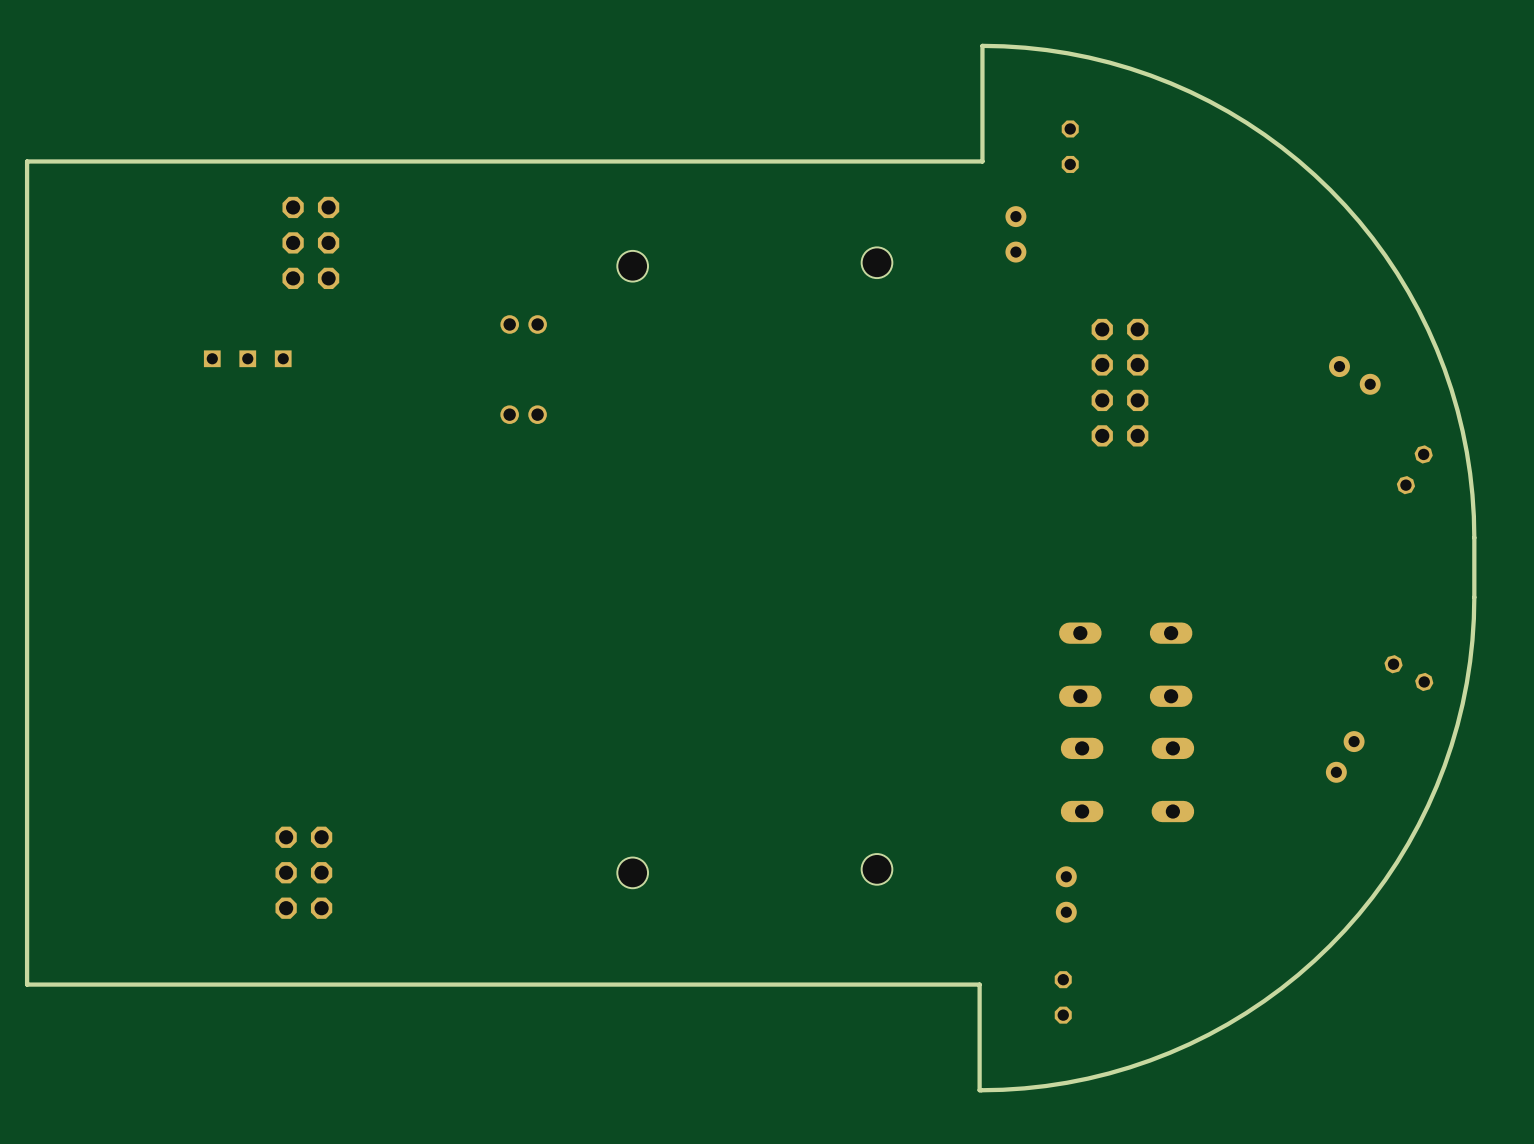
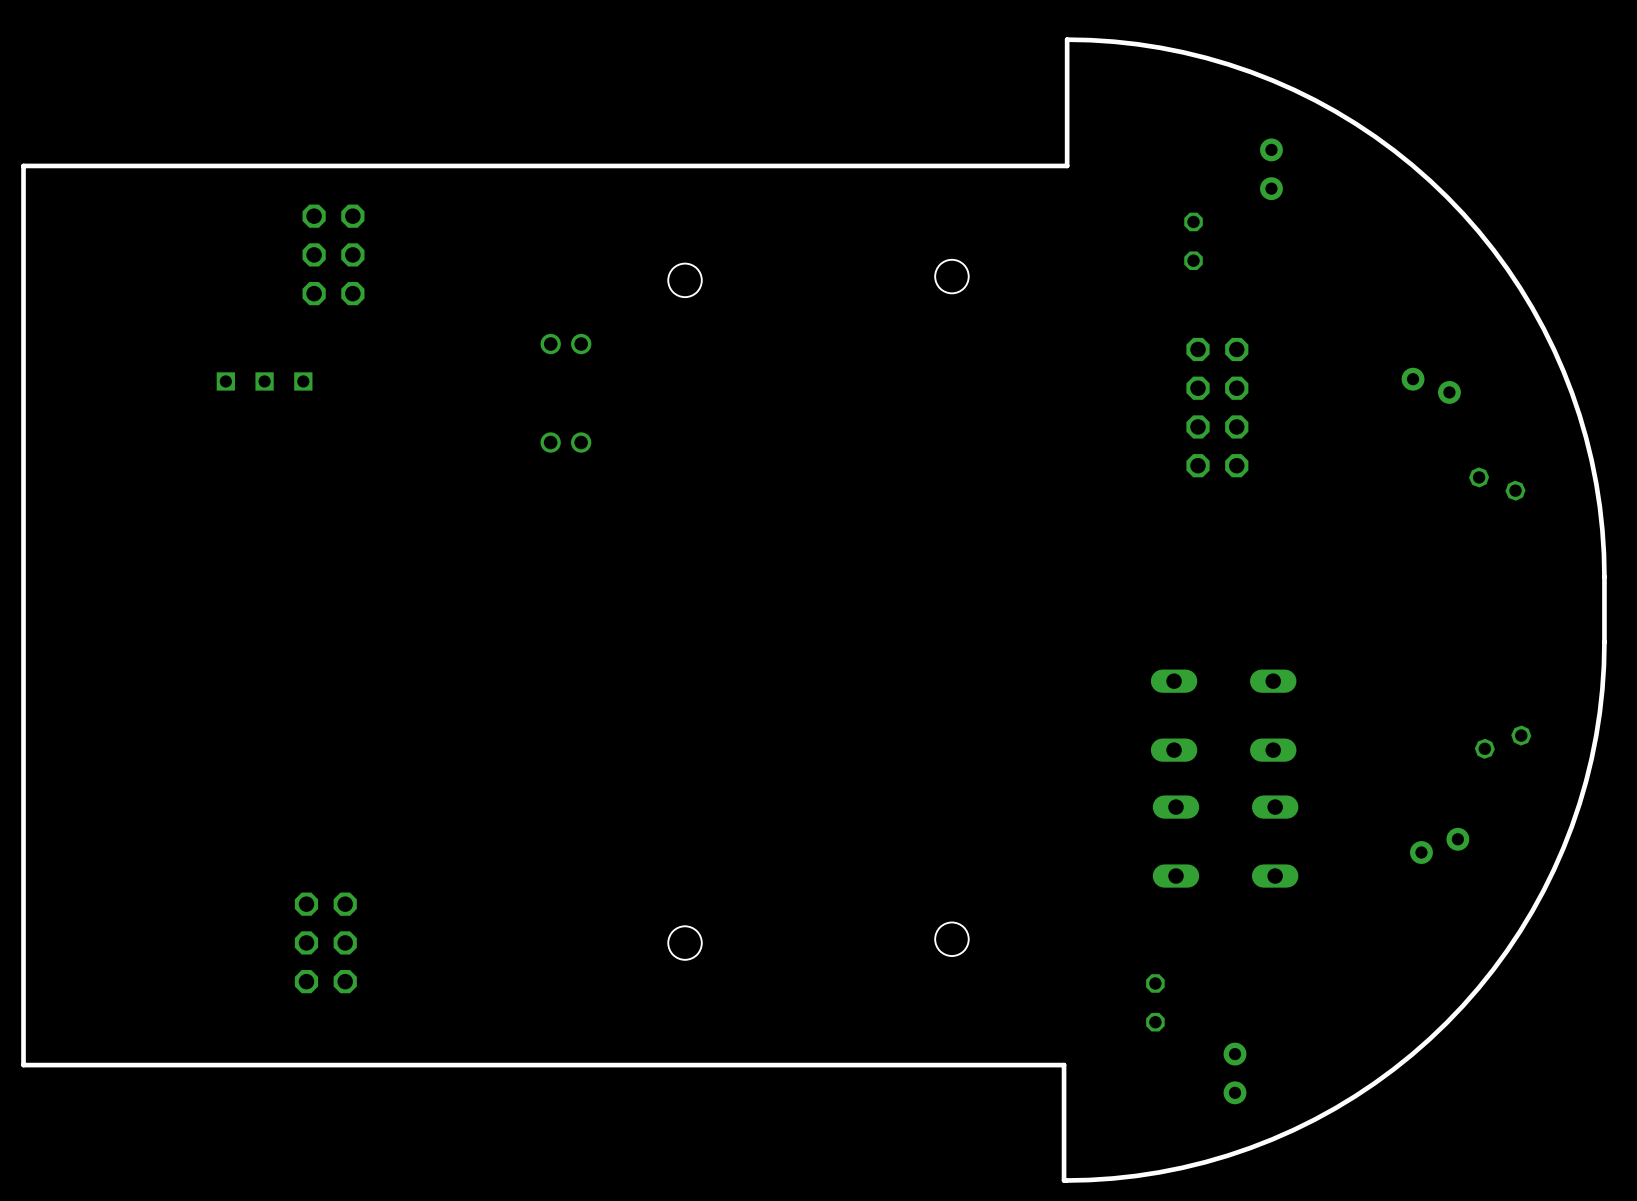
part position: (1070, 146) -> (1193, 241)
part position: (1015, 234) -> (1271, 169)
part: none -> (1431, 385)
part: (1354, 375) -> none
part: none -> (1497, 484)
part: (1414, 469) -> none
part: (1408, 673) -> none
part: none -> (1503, 742)
part: (1345, 756) -> none
part: none -> (1439, 845)
part position: (1066, 894) -> (1235, 1073)
part position: (1063, 997) -> (1155, 1002)

